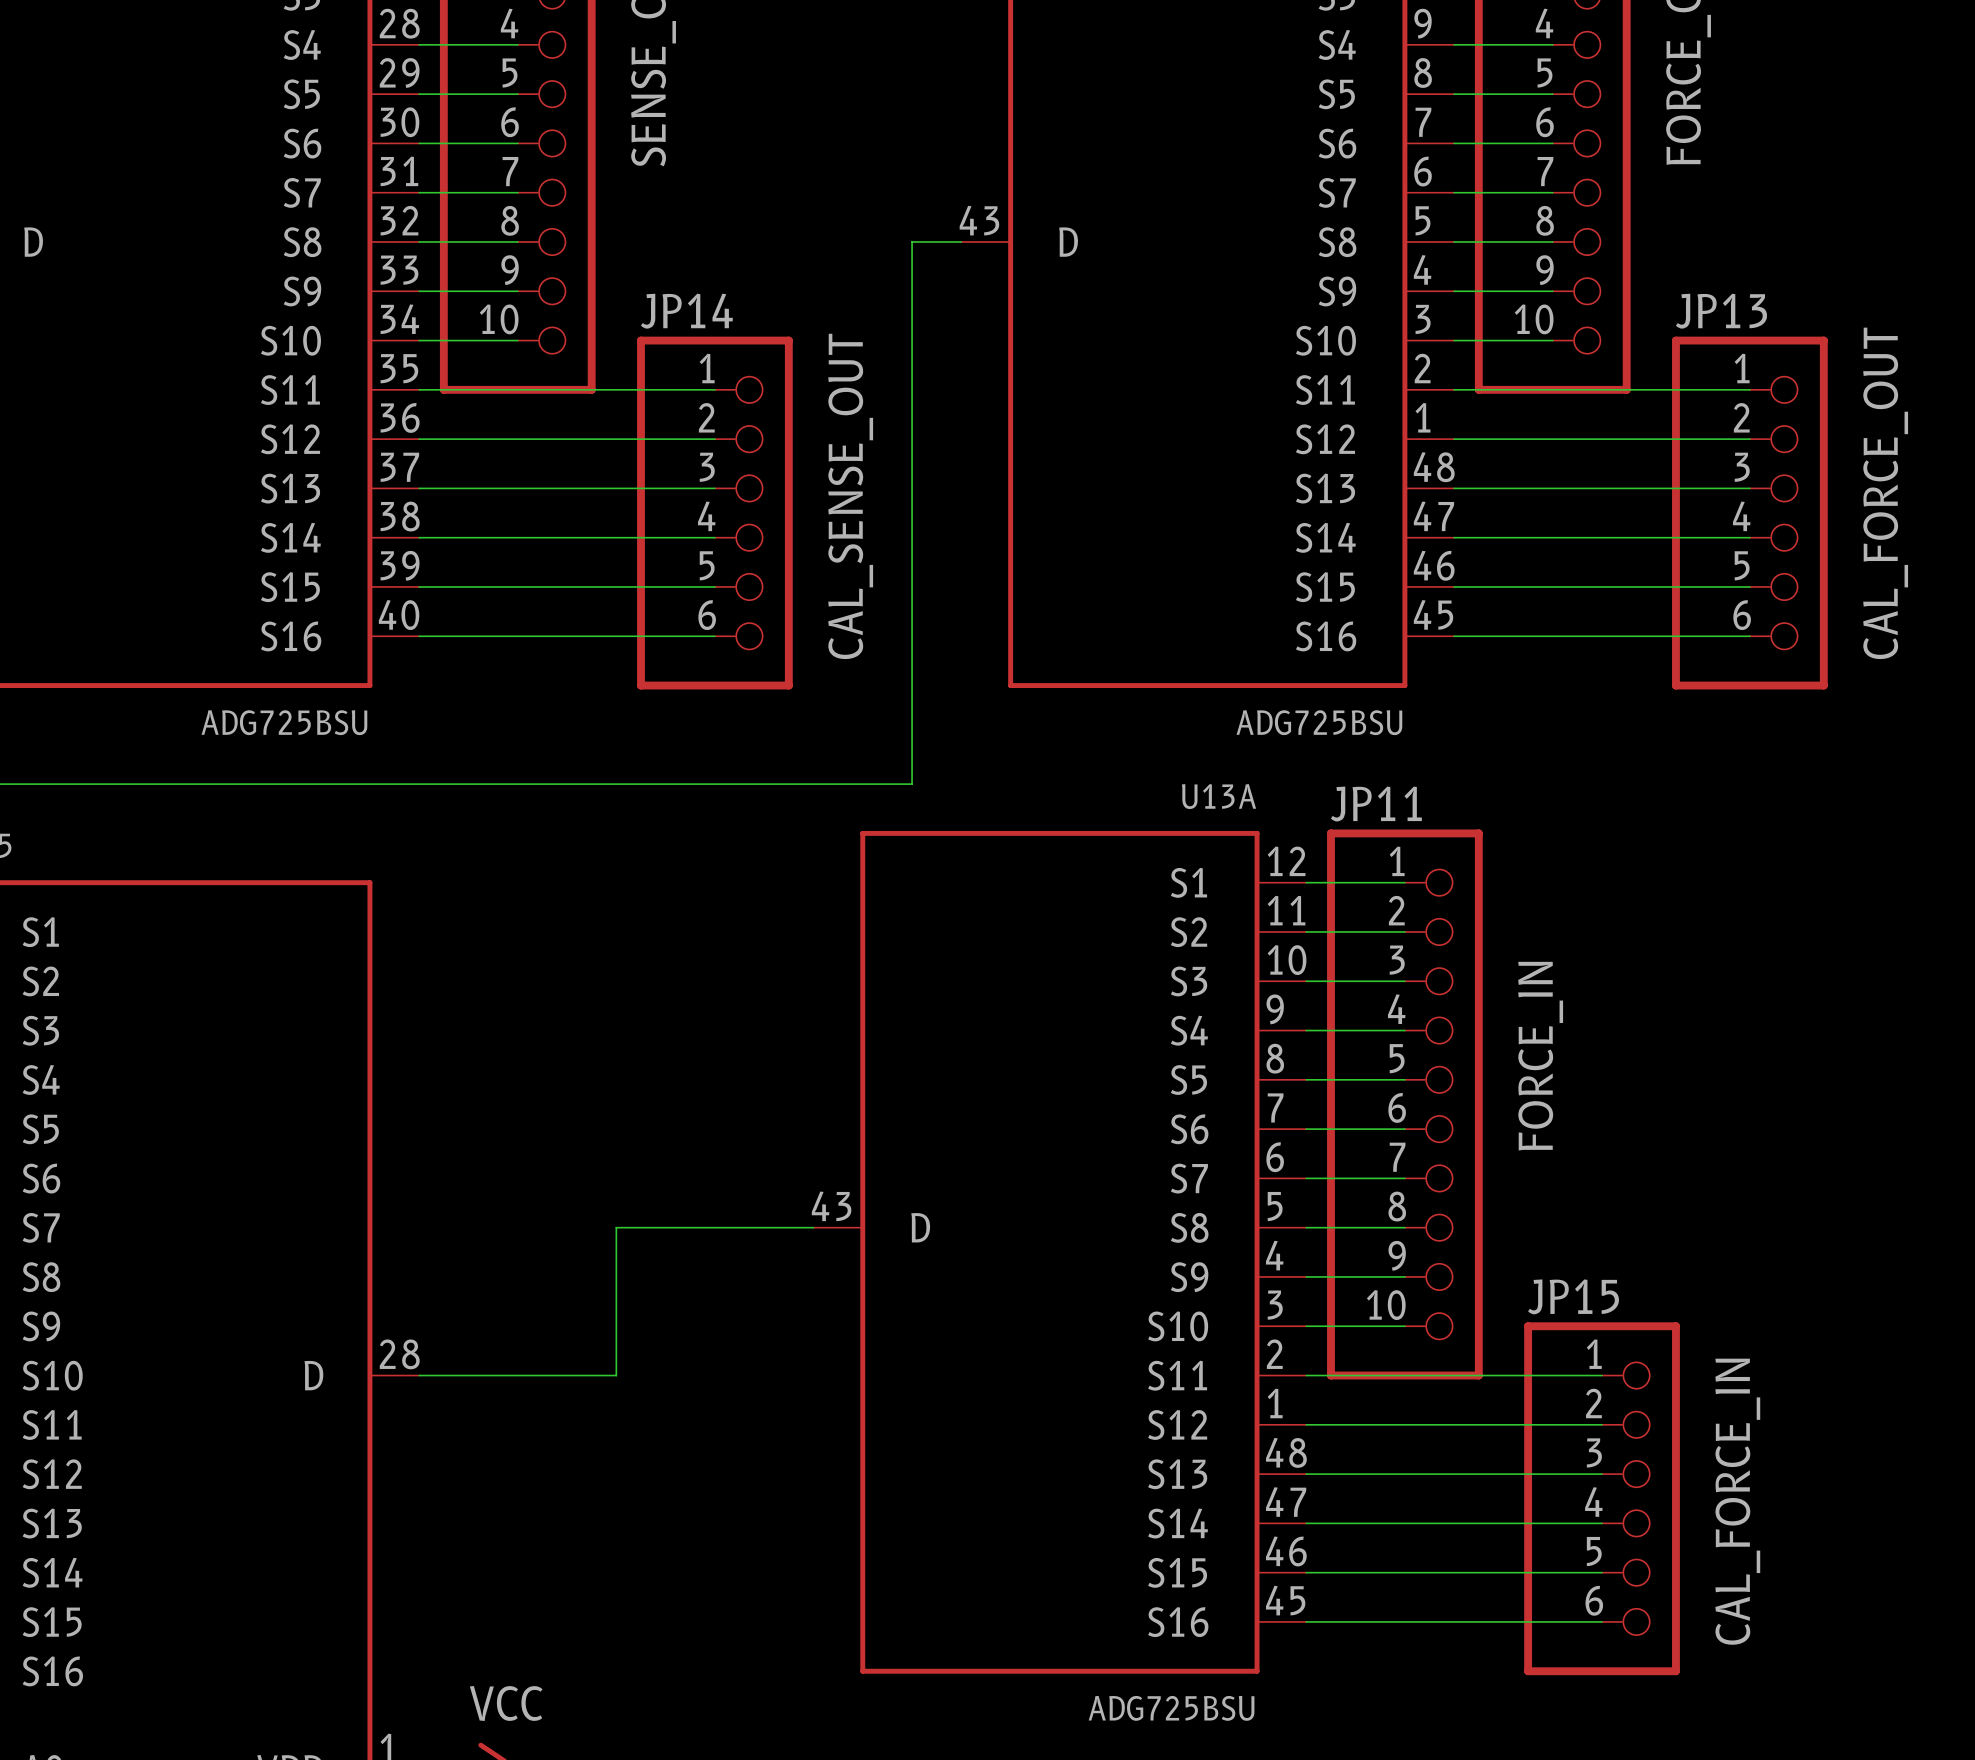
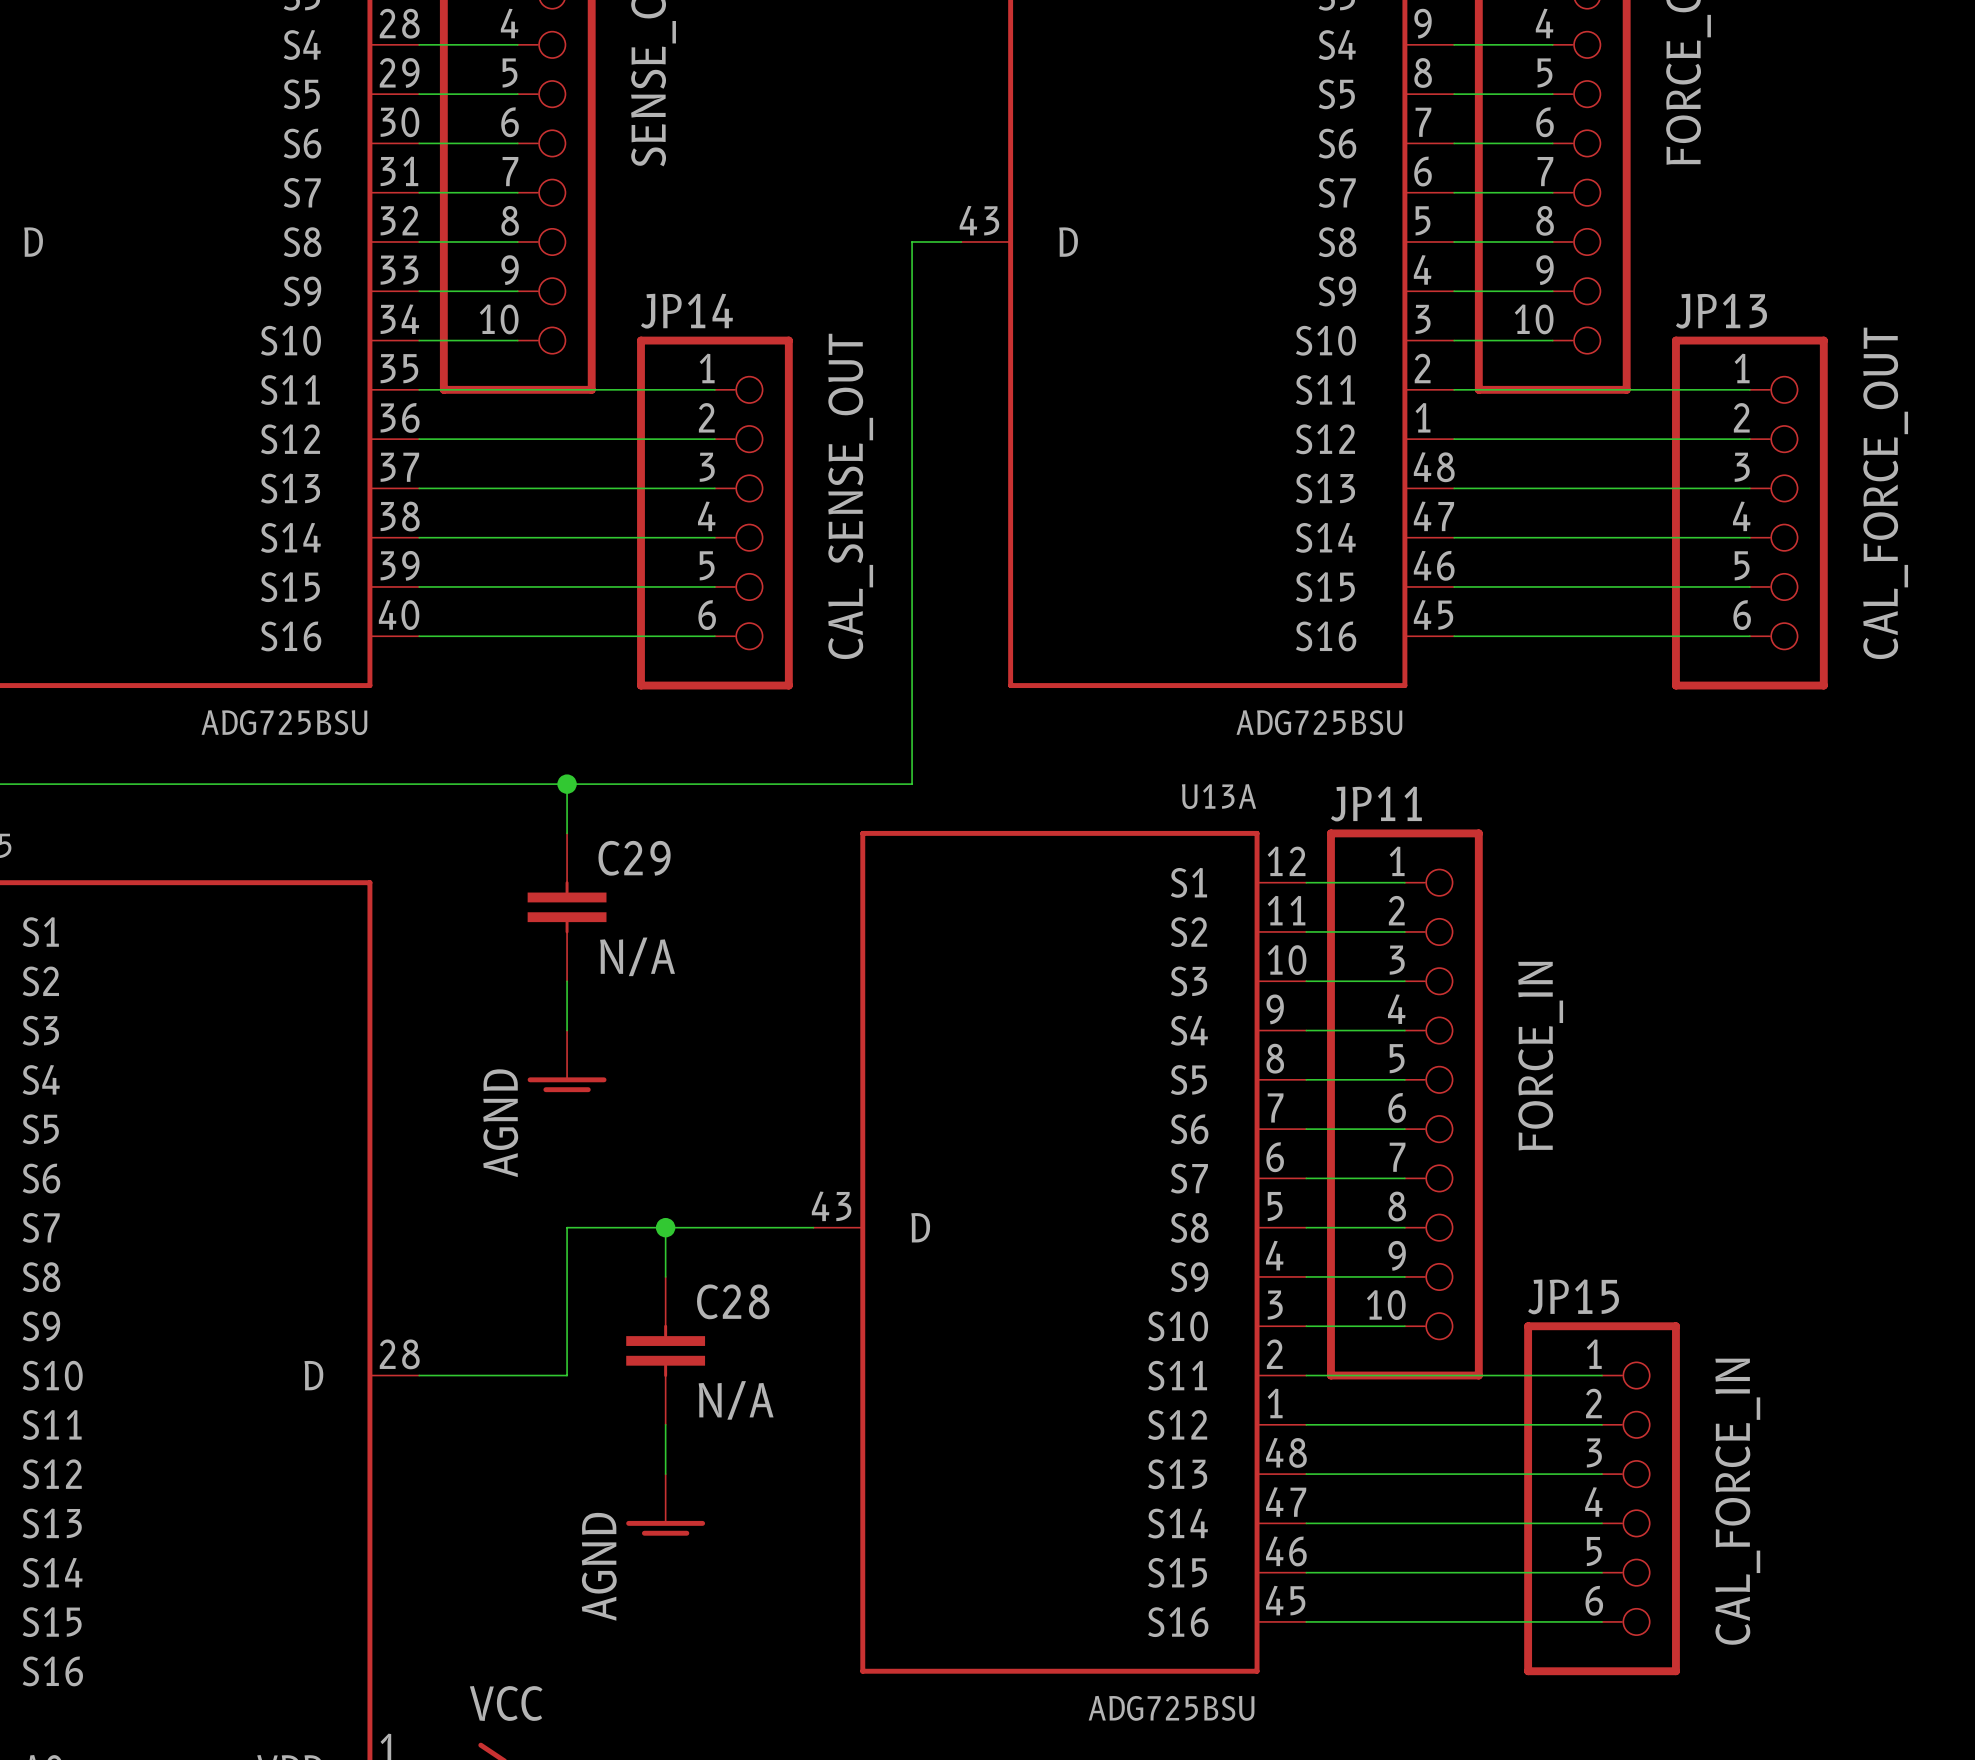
wire: none -> (567, 784) (567, 833)
junction: none -> (567, 784)
C29: none -> N/A (567, 907)
wire: none -> (567, 981) (567, 1030)
power symbol: none -> AGND (567, 1061)
wire: (616, 1227) (616, 1375) (567, 1375) -> (616, 1227) (567, 1227) (567, 1375)
wire: none -> (665, 1227) (665, 1276)
junction: none -> (665, 1227)
C28: none -> N/A (665, 1350)
wire: none -> (665, 1424) (665, 1474)
power symbol: none -> AGND (665, 1504)

